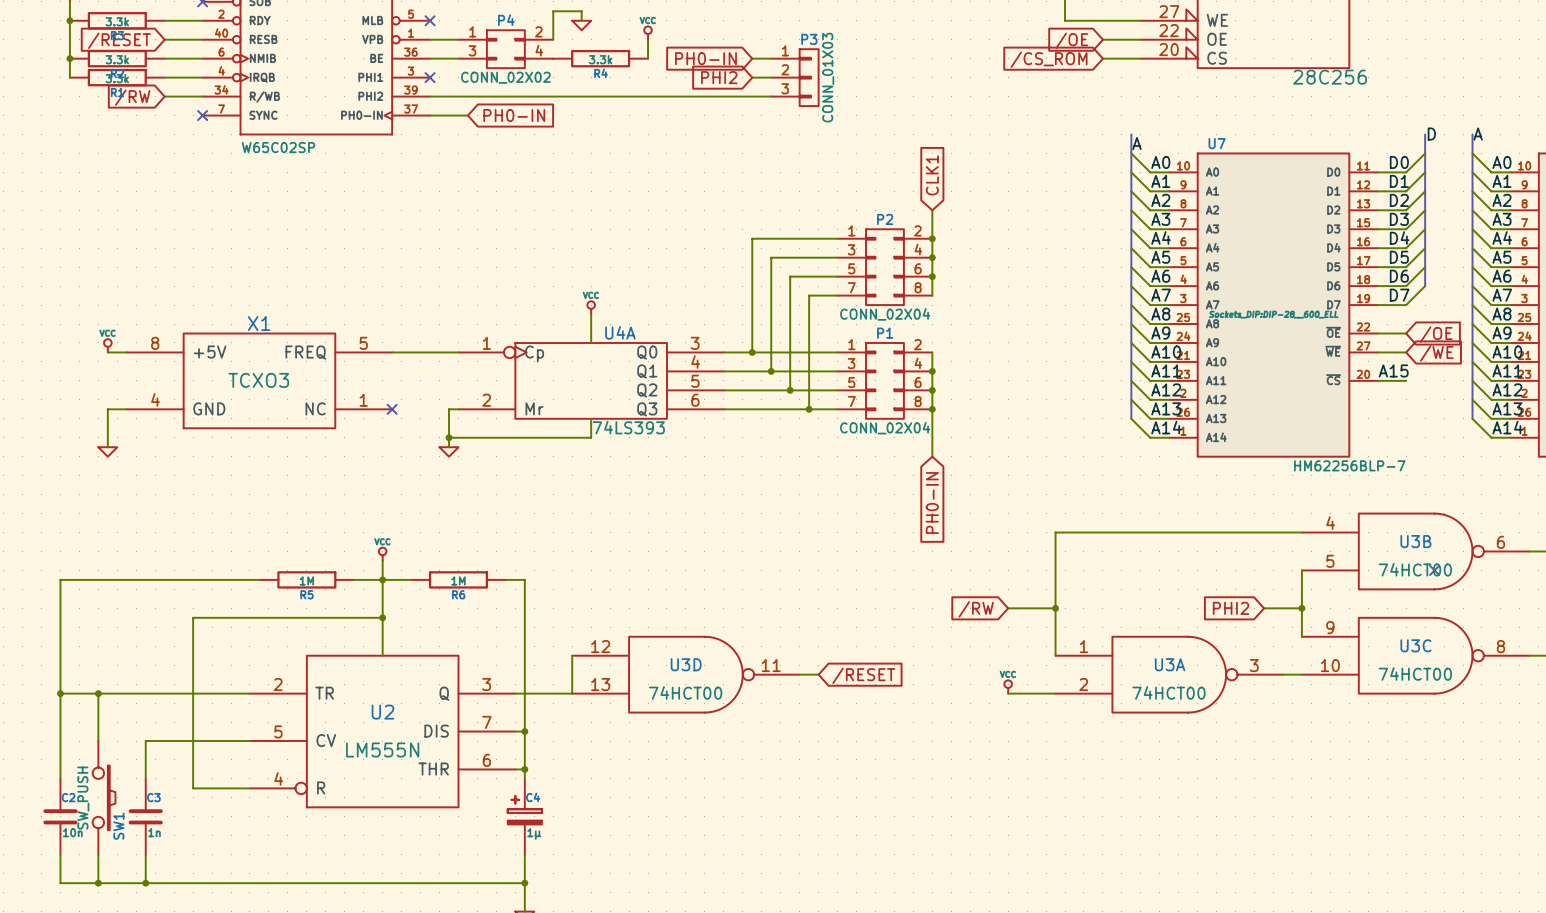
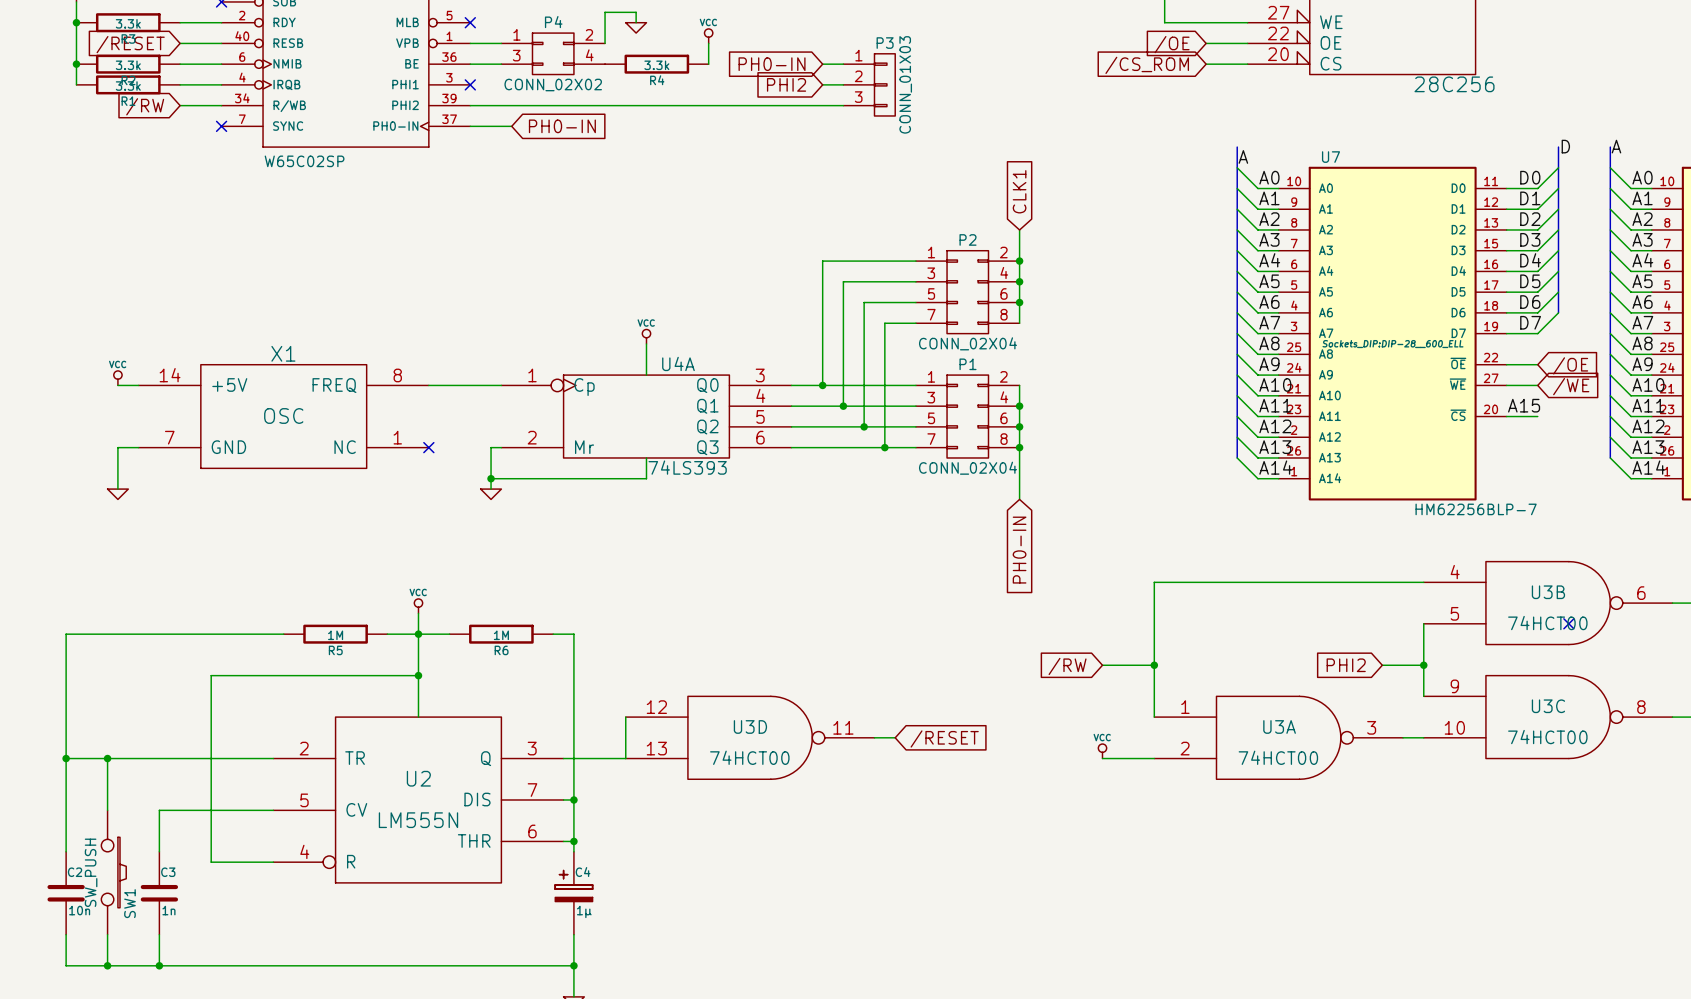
X1 pin number: 8 (155, 343) -> 14 (170, 375)
X1 pin number: 5 (363, 343) -> 8 (397, 375)
X1 value: TCXO3 (258, 380) -> OSC (283, 415)
X1 pin number: 4 (155, 399) -> 7 (169, 437)

